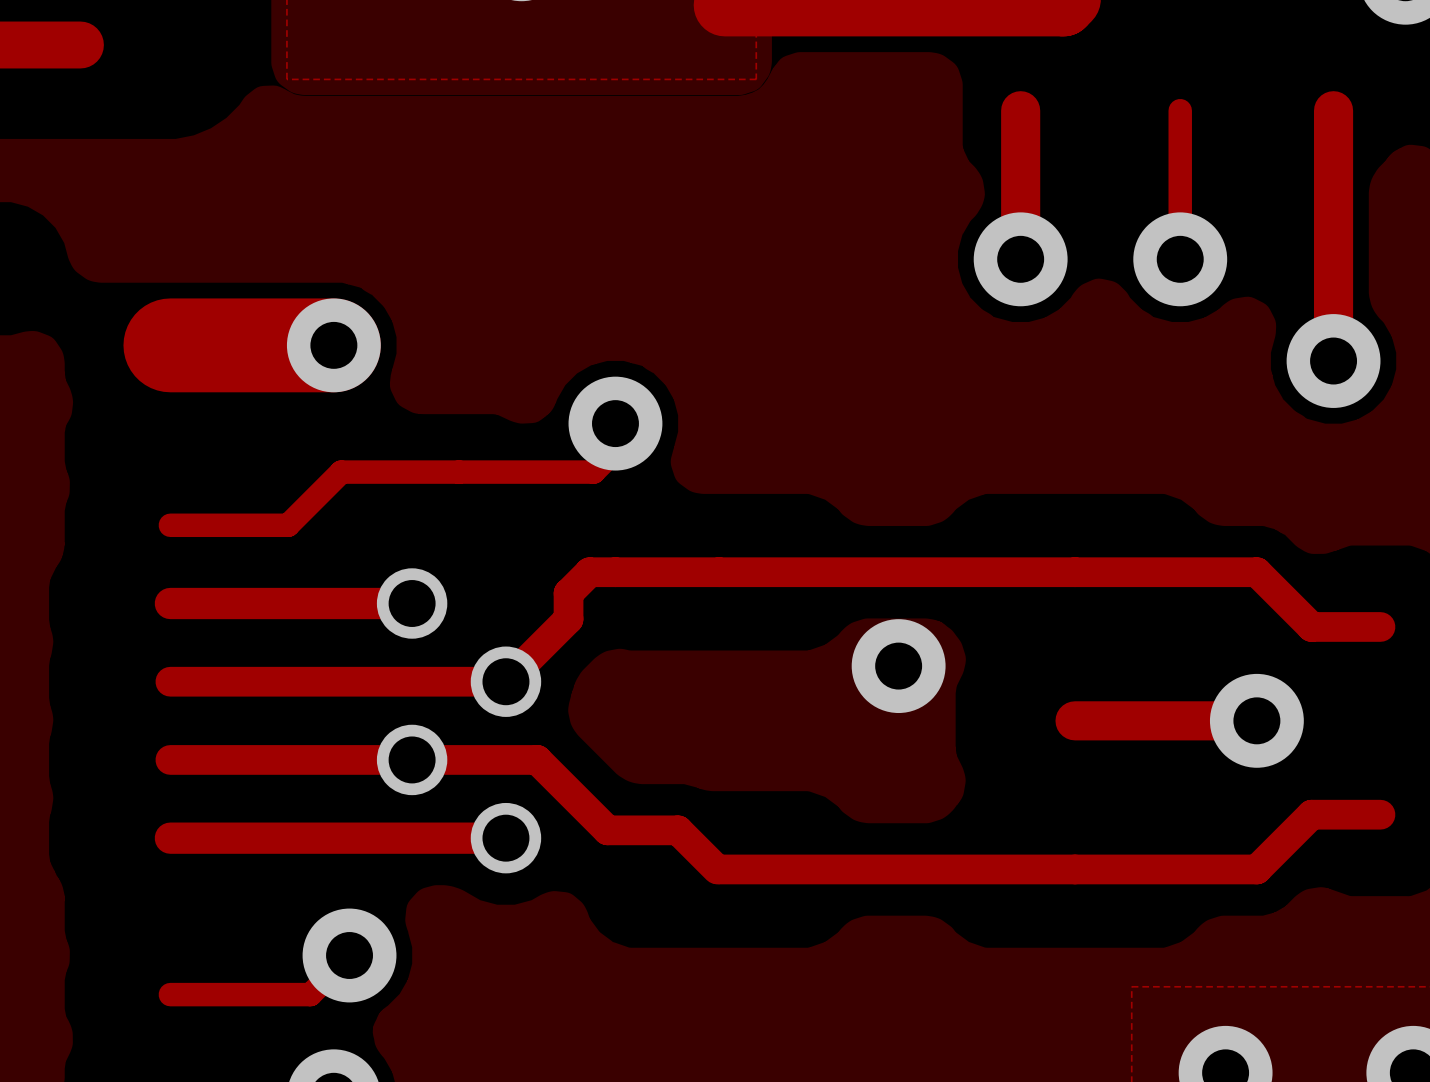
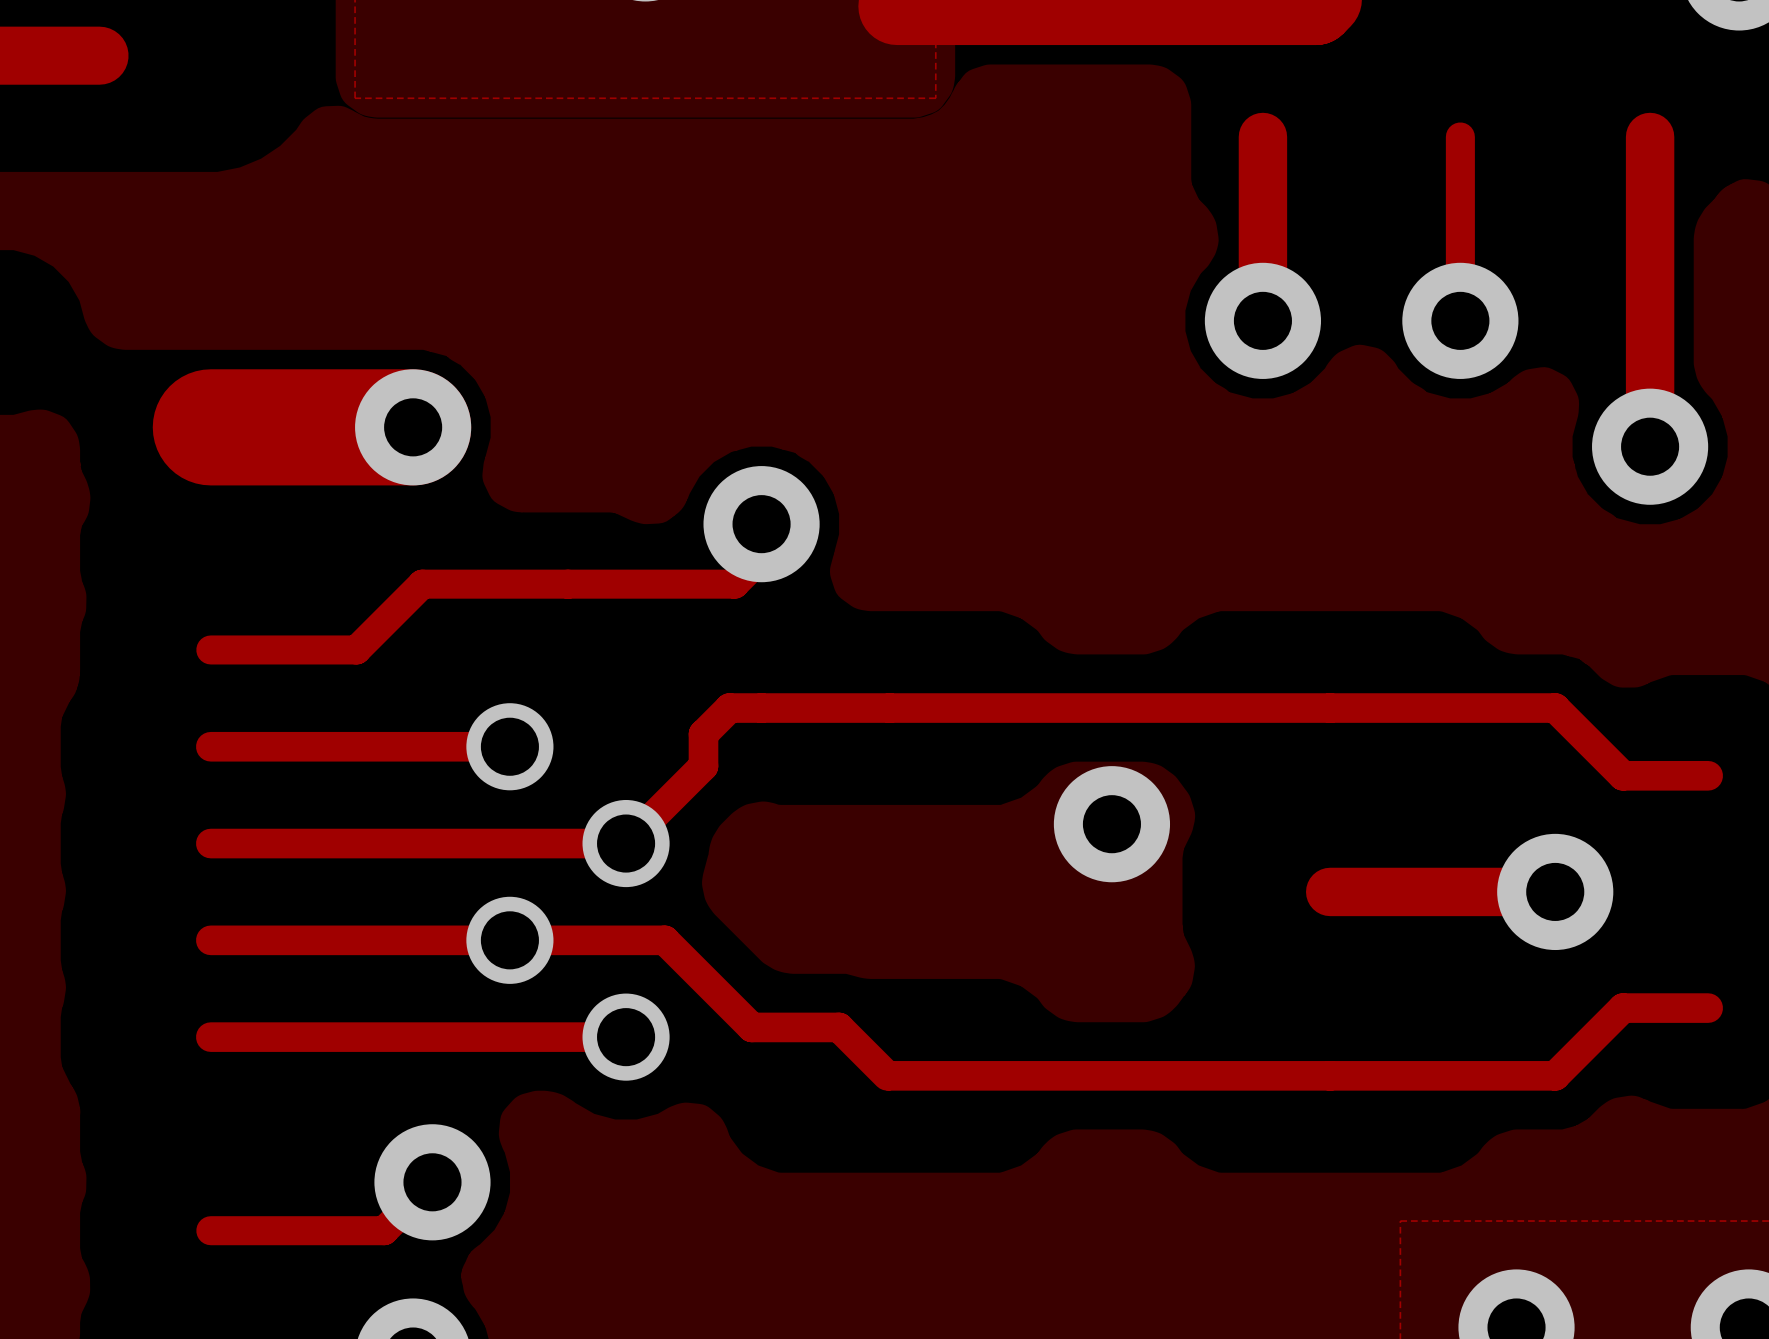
track width: thick (170, 603) (412, 603) -> thin (210, 746) (509, 746)
track width: thick (1380, 626) (1311, 626) (1256, 572) (589, 572) (568, 593) (568, 619) (505, 681) (170, 681) -> thin (1708, 775) (1622, 775) (1555, 708) (729, 708) (703, 734) (703, 766) (626, 843) (210, 843)
track width: thick (170, 759) (537, 759) (607, 830) (678, 830) (717, 869) -> thin (210, 940) (664, 940) (751, 1027) (839, 1027) (887, 1075)
track width: thick (1380, 814) (1311, 814) (1256, 869) (719, 869) -> thin (1708, 1008) (1622, 1008) (1555, 1075) (889, 1075)
track width: thick (170, 838) (505, 838) -> thin (210, 1037) (626, 1037)

